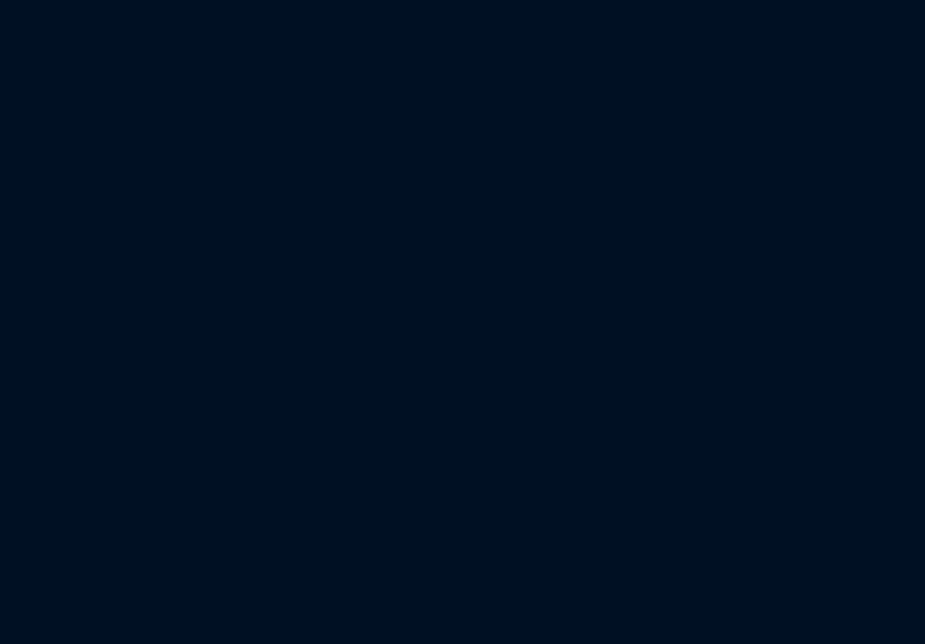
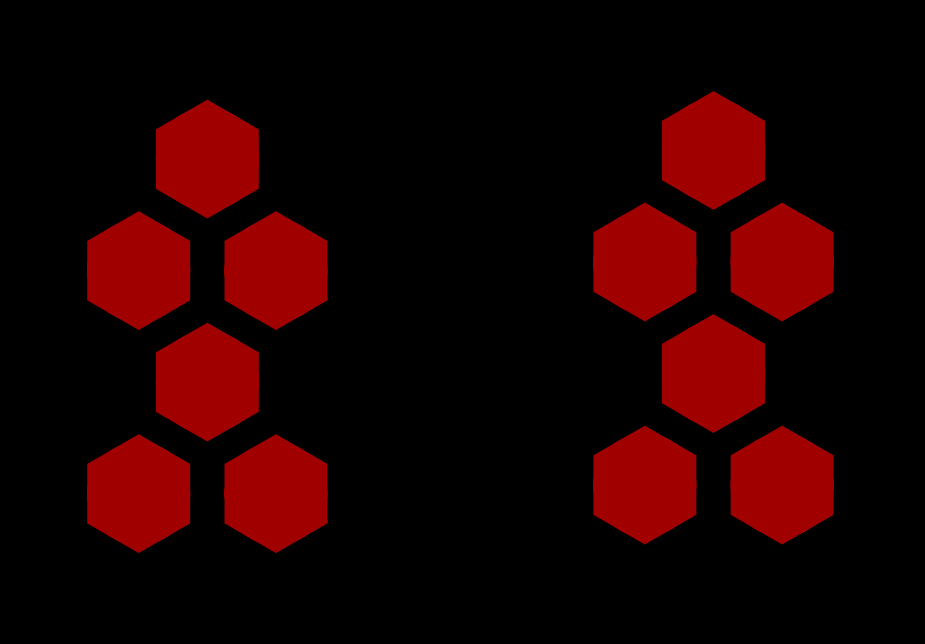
part: none -> (713, 150)
part: none -> (207, 159)
part: none -> (644, 262)
part: none -> (782, 262)
part: none -> (138, 270)
part: none -> (275, 270)
part: none -> (713, 373)
part: none -> (207, 382)
part: none -> (644, 485)
part: none -> (782, 485)
part: none -> (138, 493)
part: none -> (275, 493)

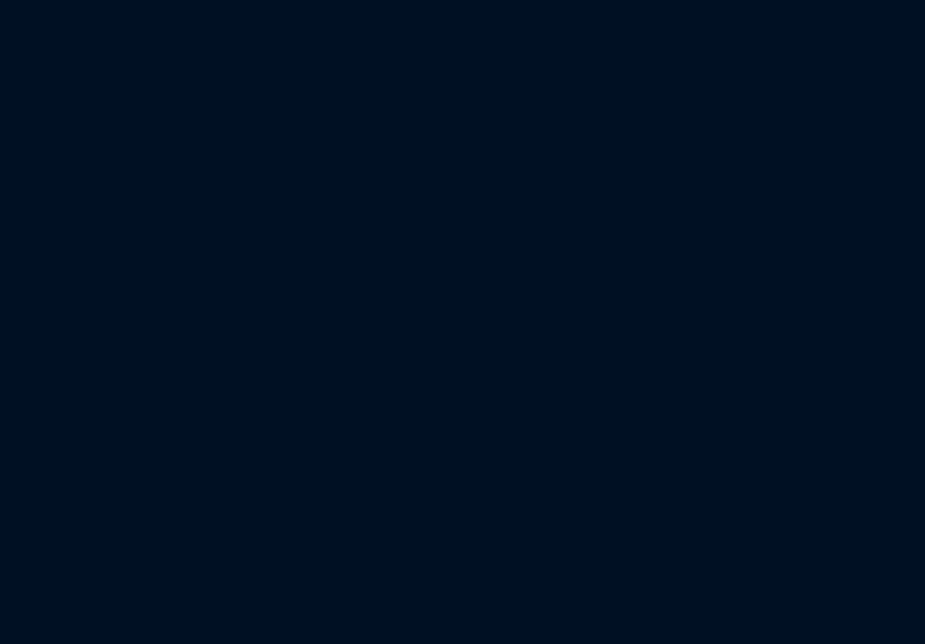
part: (713, 150) -> none
part: (207, 159) -> none
part: (644, 262) -> none
part: (782, 262) -> none
part: (138, 270) -> none
part: (275, 270) -> none
part: (713, 373) -> none
part: (207, 382) -> none
part: (644, 485) -> none
part: (782, 485) -> none
part: (138, 493) -> none
part: (275, 493) -> none

